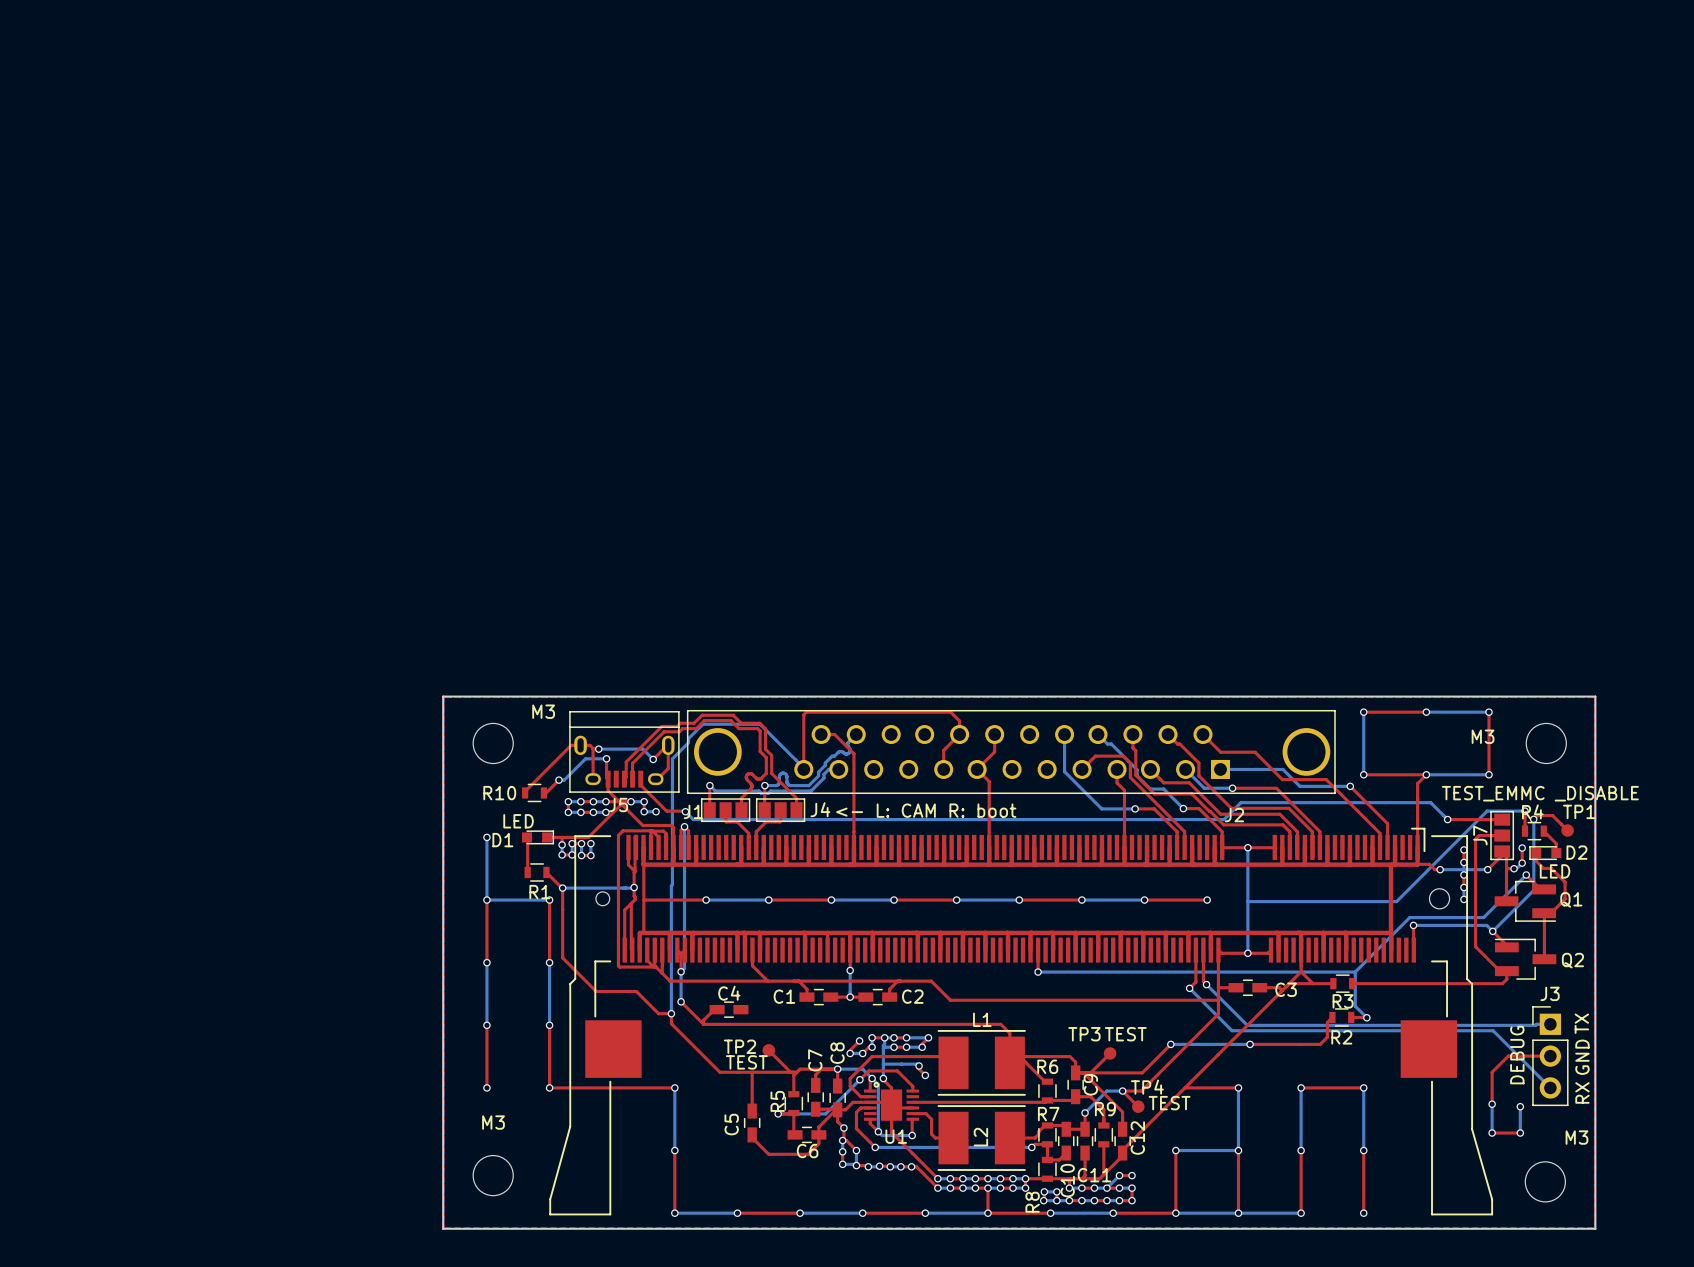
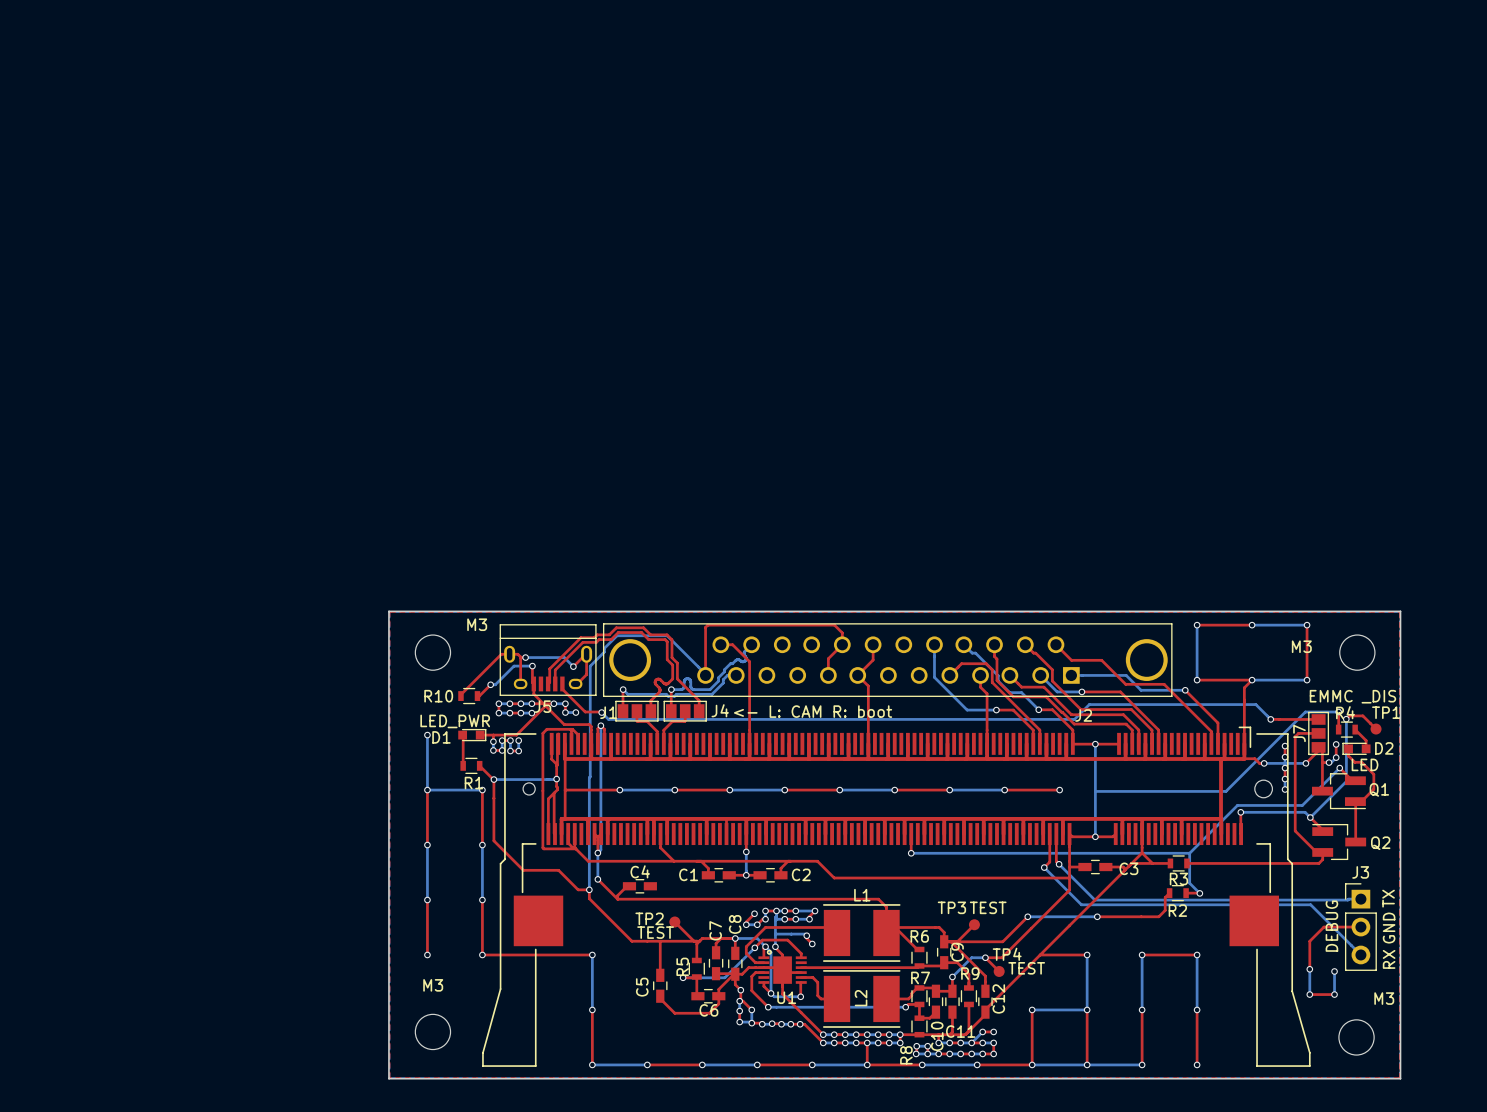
TP1 value: TEST_EMMC _DISABLE (1540, 793) -> EMMC _DIS (1352, 696)
D1 value: LED (518, 821) -> LED_PWR (455, 721)
top track: (652, 831) (663, 831) (666, 833) (666, 847) -> none
top track: (662, 950) (662, 973) -> none

